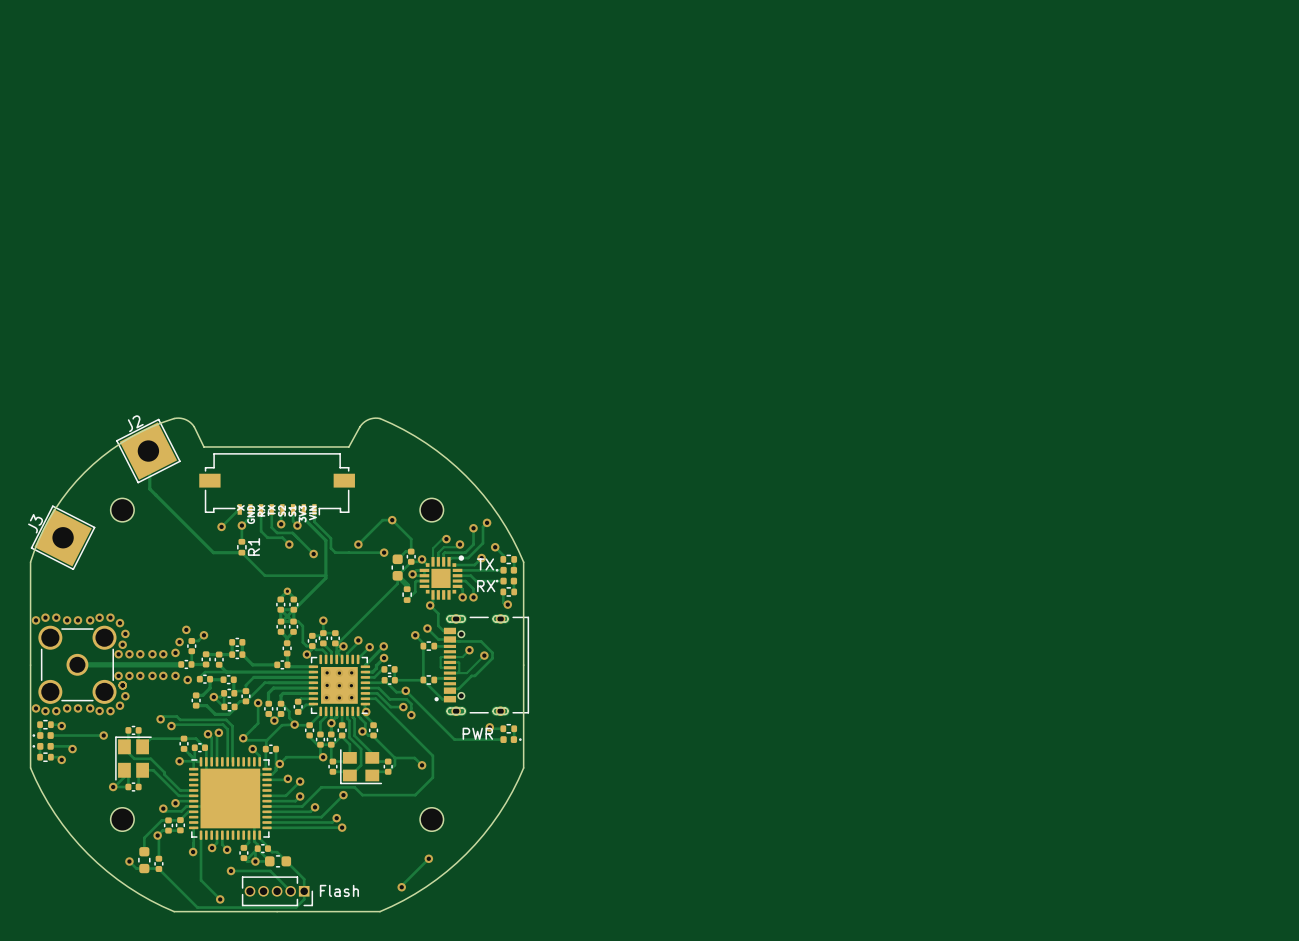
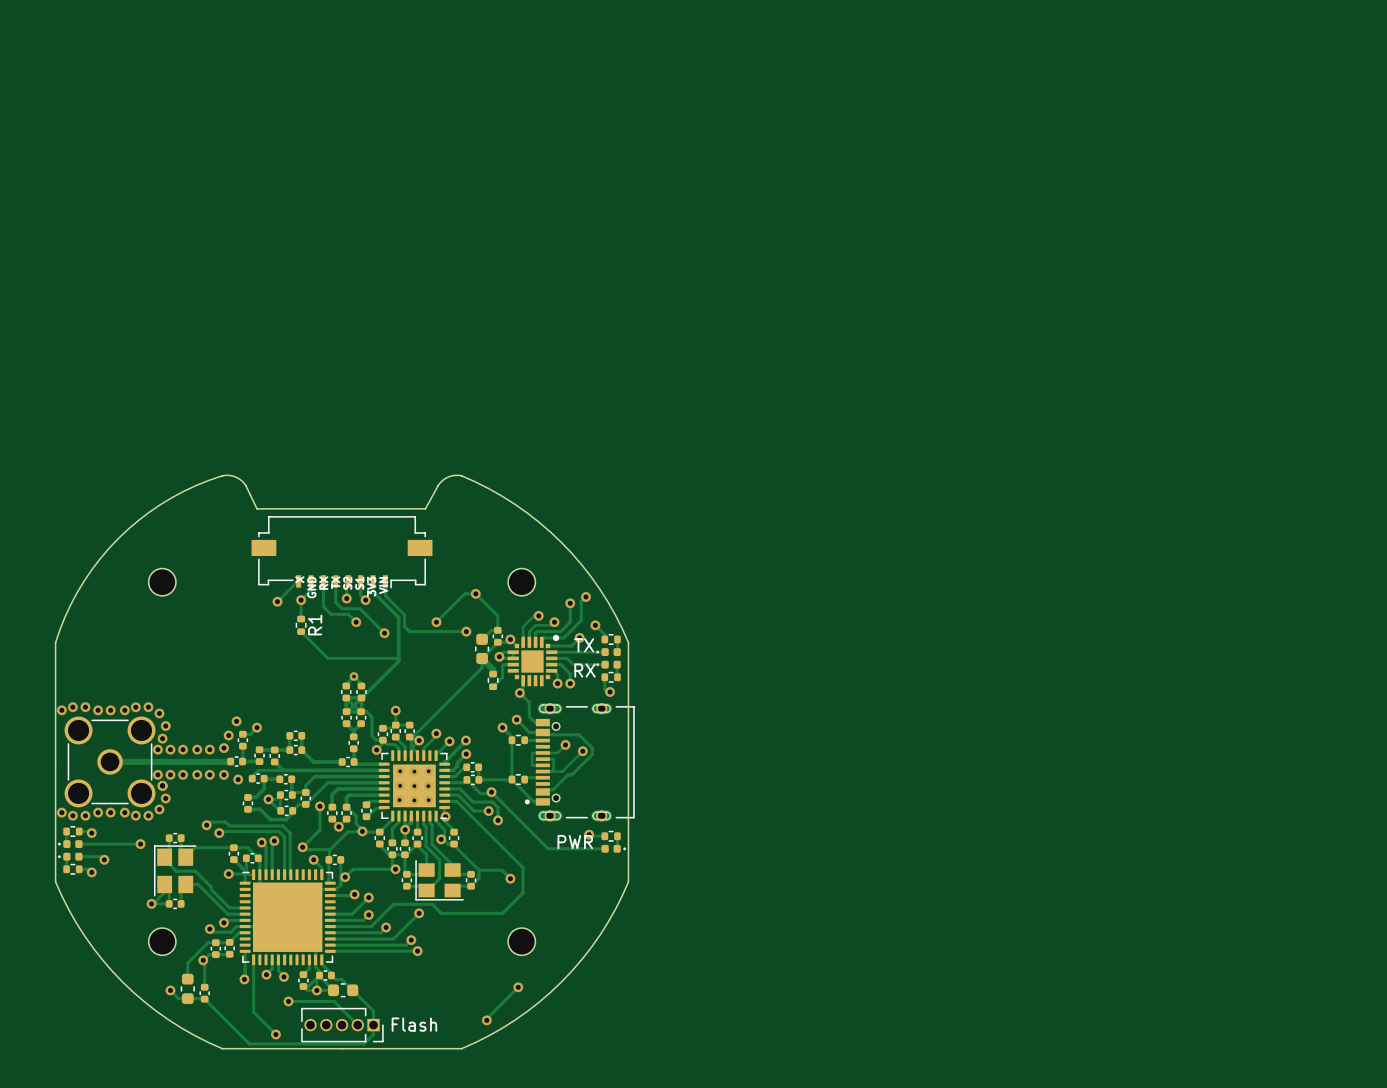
J2: (148, 451) -> none
track: (149, 452) (149, 488) (213, 552) (241, 552) -> none
J3: (63, 537) -> none

